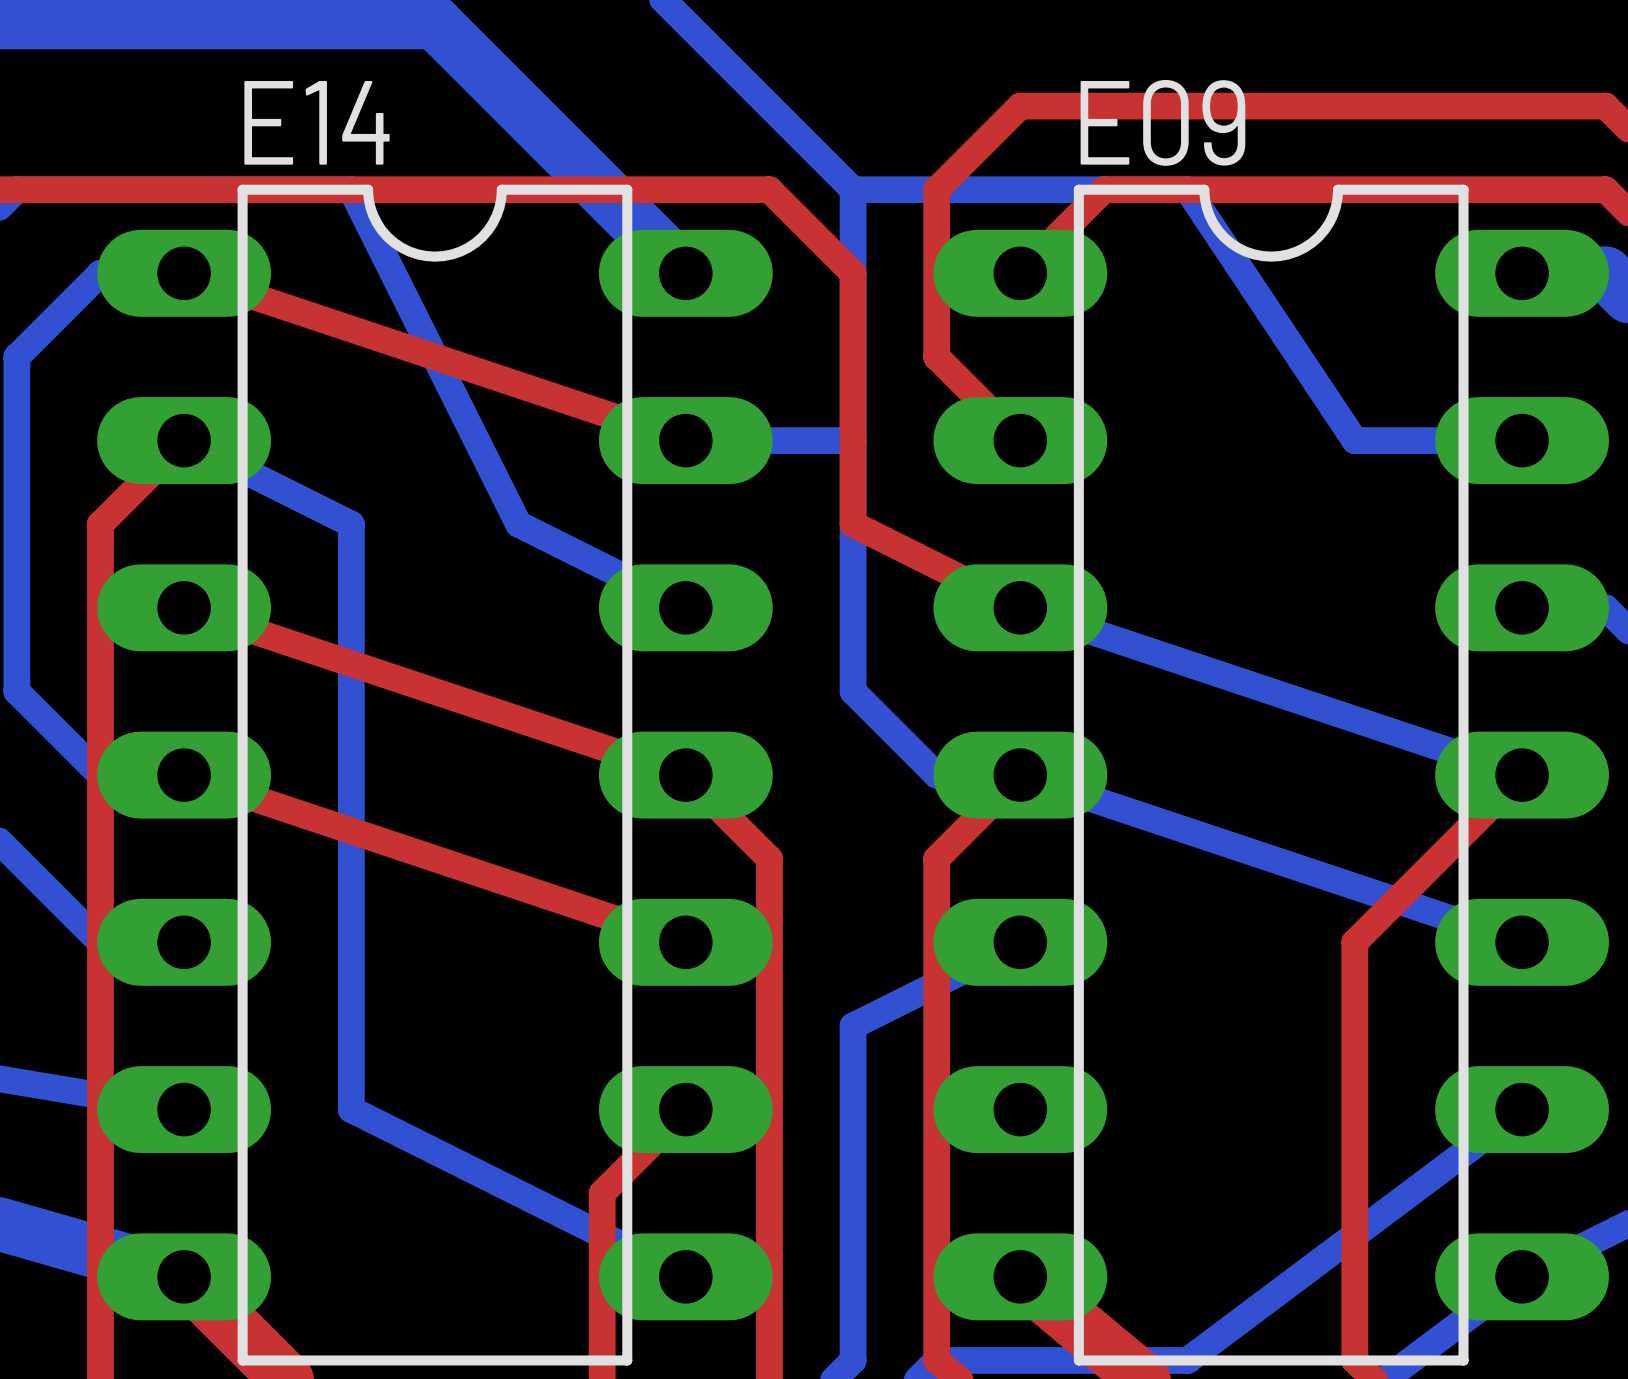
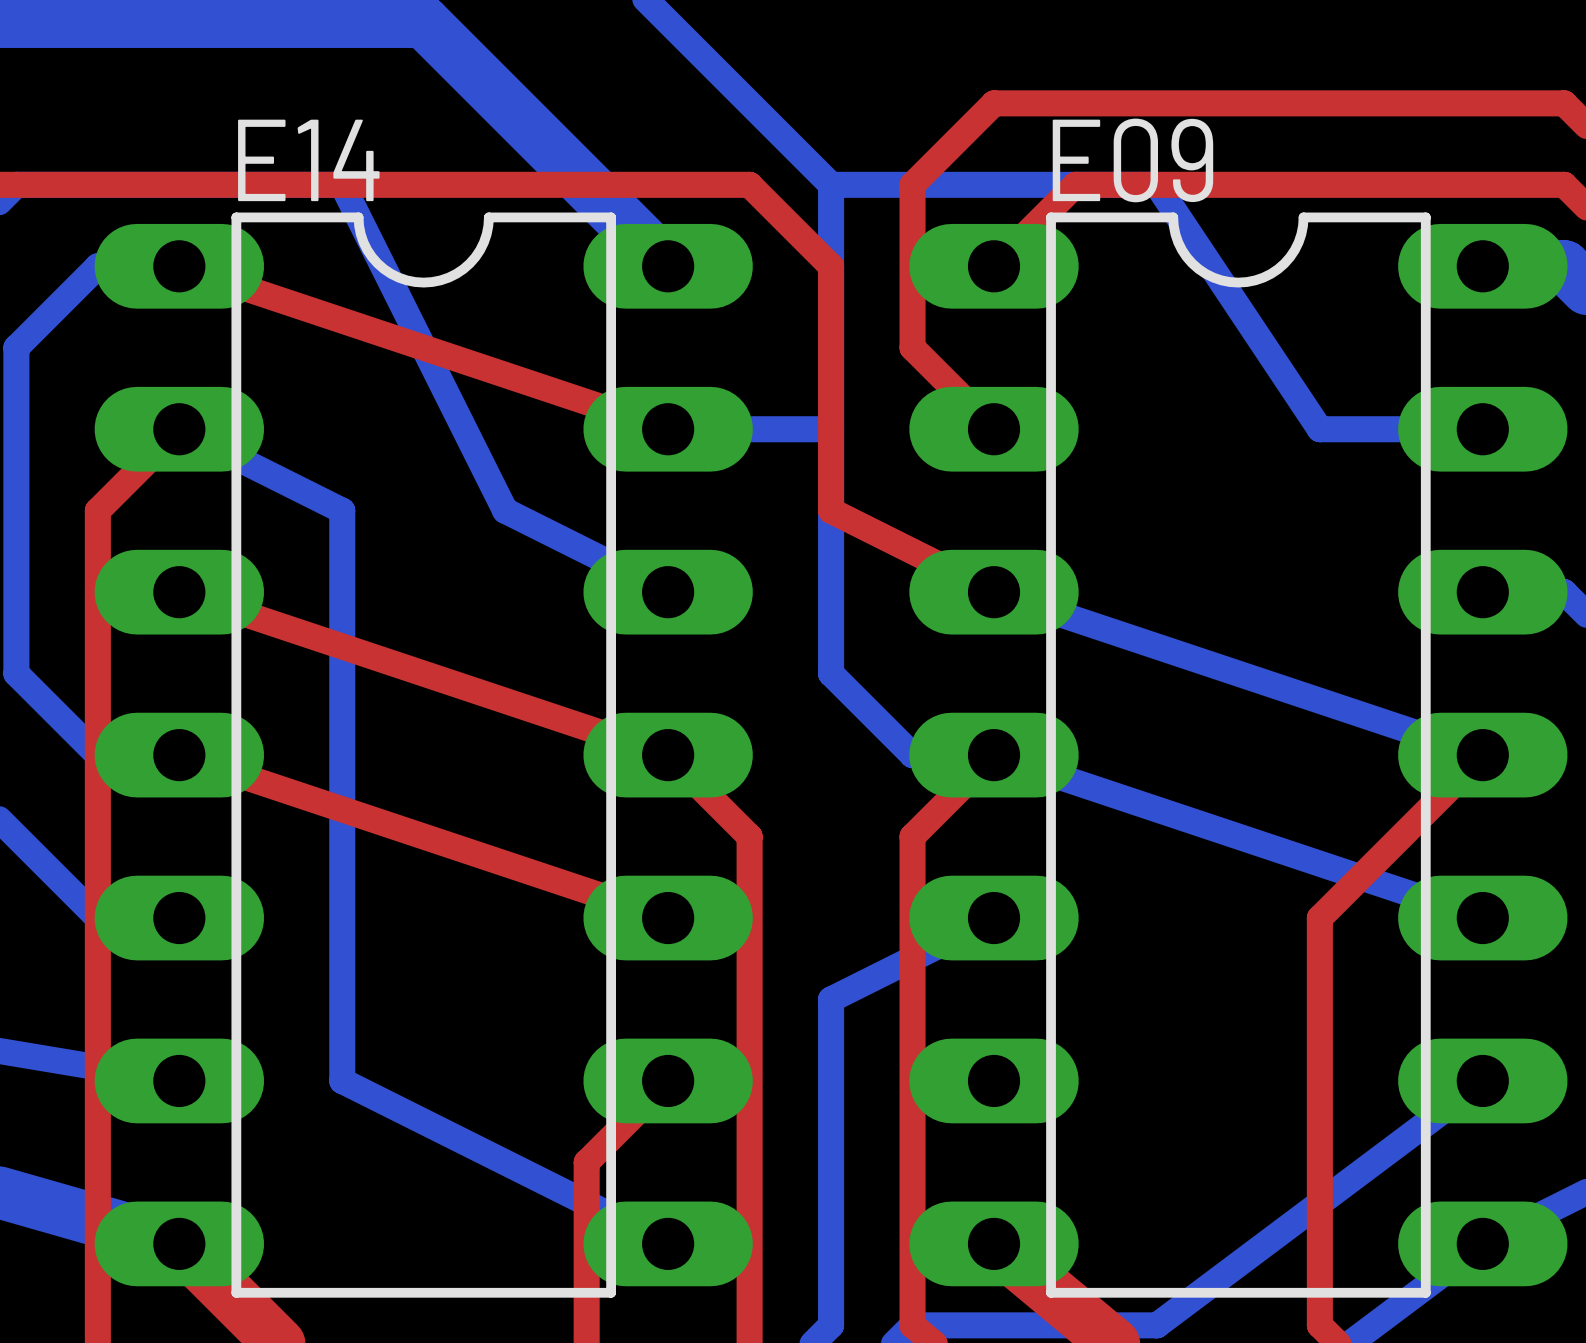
E14 name position: E14 (316, 122) -> E14 (308, 160)
E09 name position: E09 (1162, 122) -> E09 (1132, 160)
E14 footprint: [97, 184, 773, 1366] -> [94, 212, 753, 1298]
E09 footprint: [933, 184, 1610, 1366] -> [909, 212, 1568, 1298]

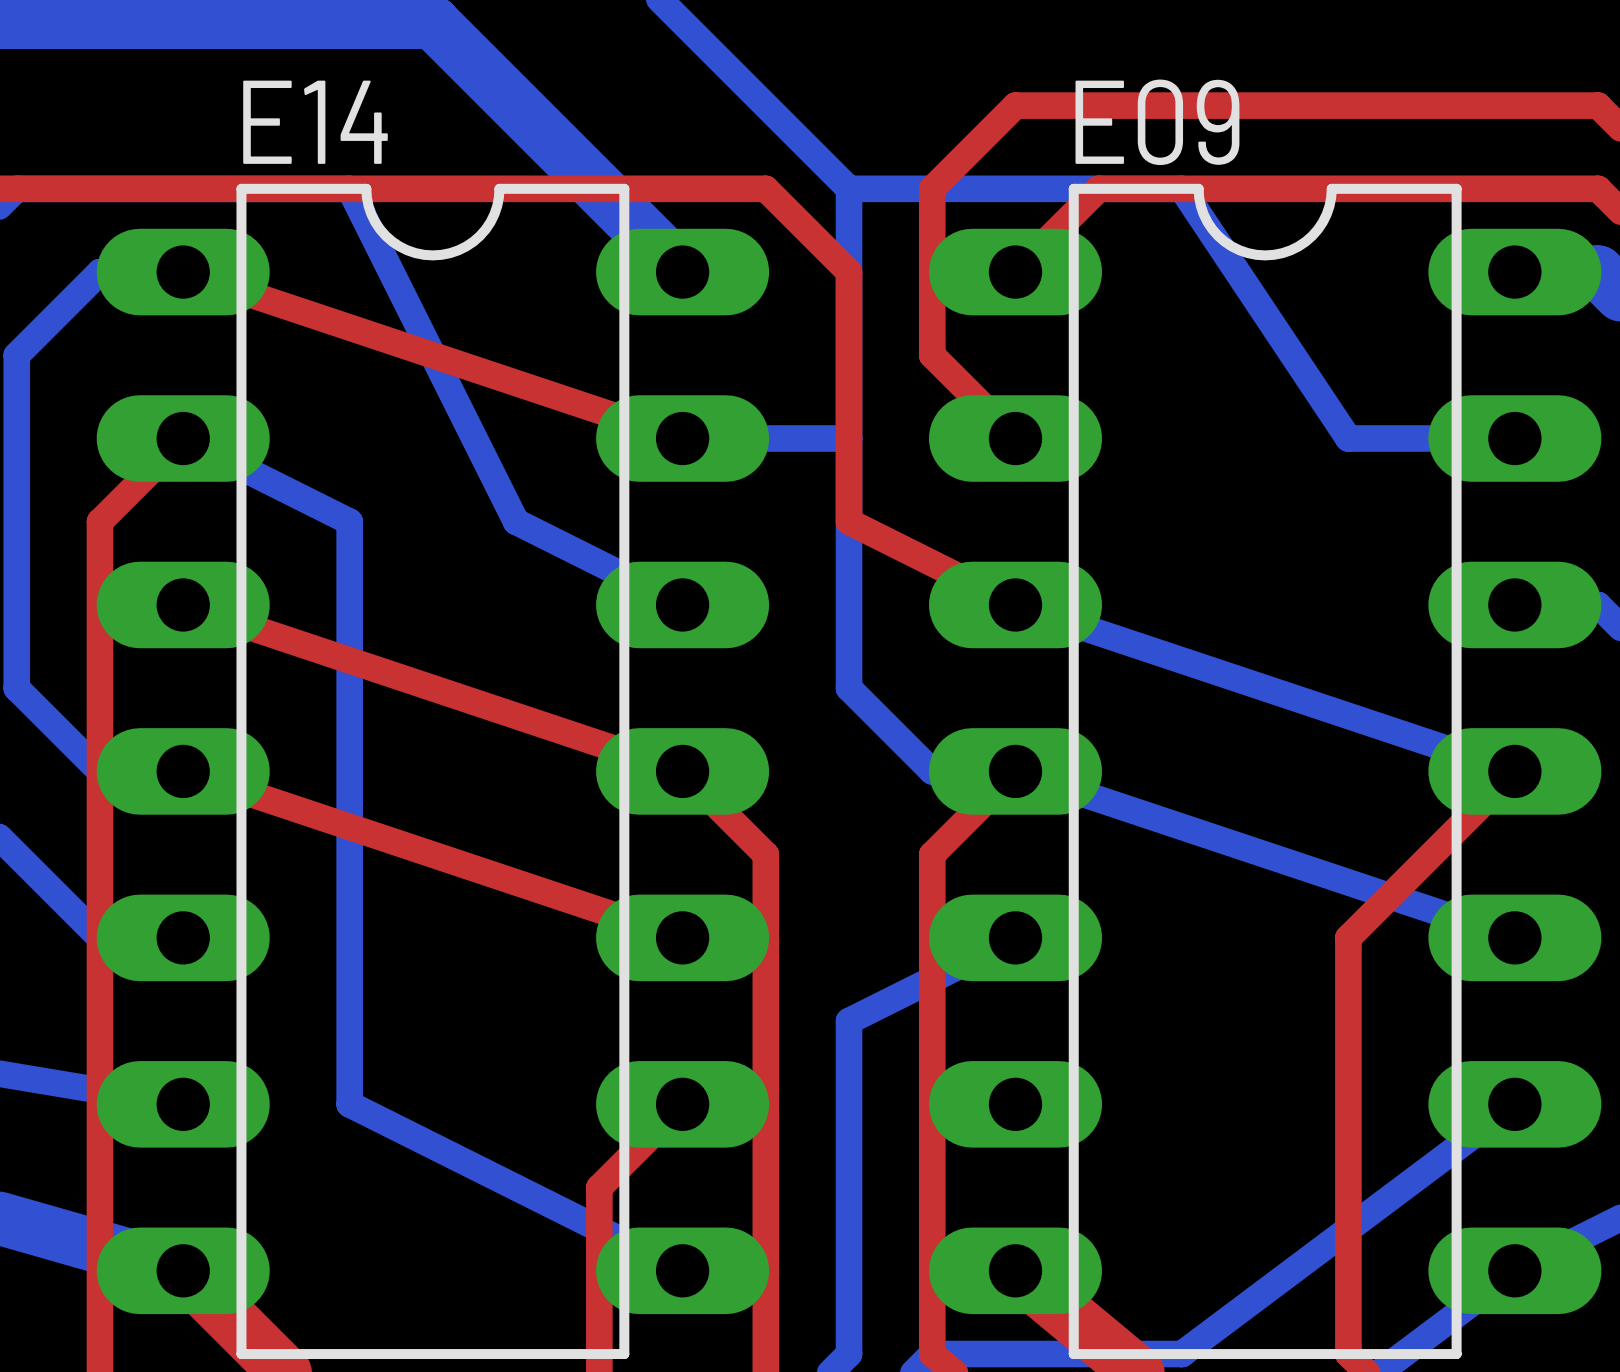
E14 name position: E14 (308, 160) -> E14 (315, 122)
E09 name position: E09 (1132, 160) -> E09 (1157, 122)
E14 footprint: [94, 212, 753, 1298] -> [96, 183, 770, 1360]
E09 footprint: [909, 212, 1568, 1298] -> [928, 183, 1602, 1360]

